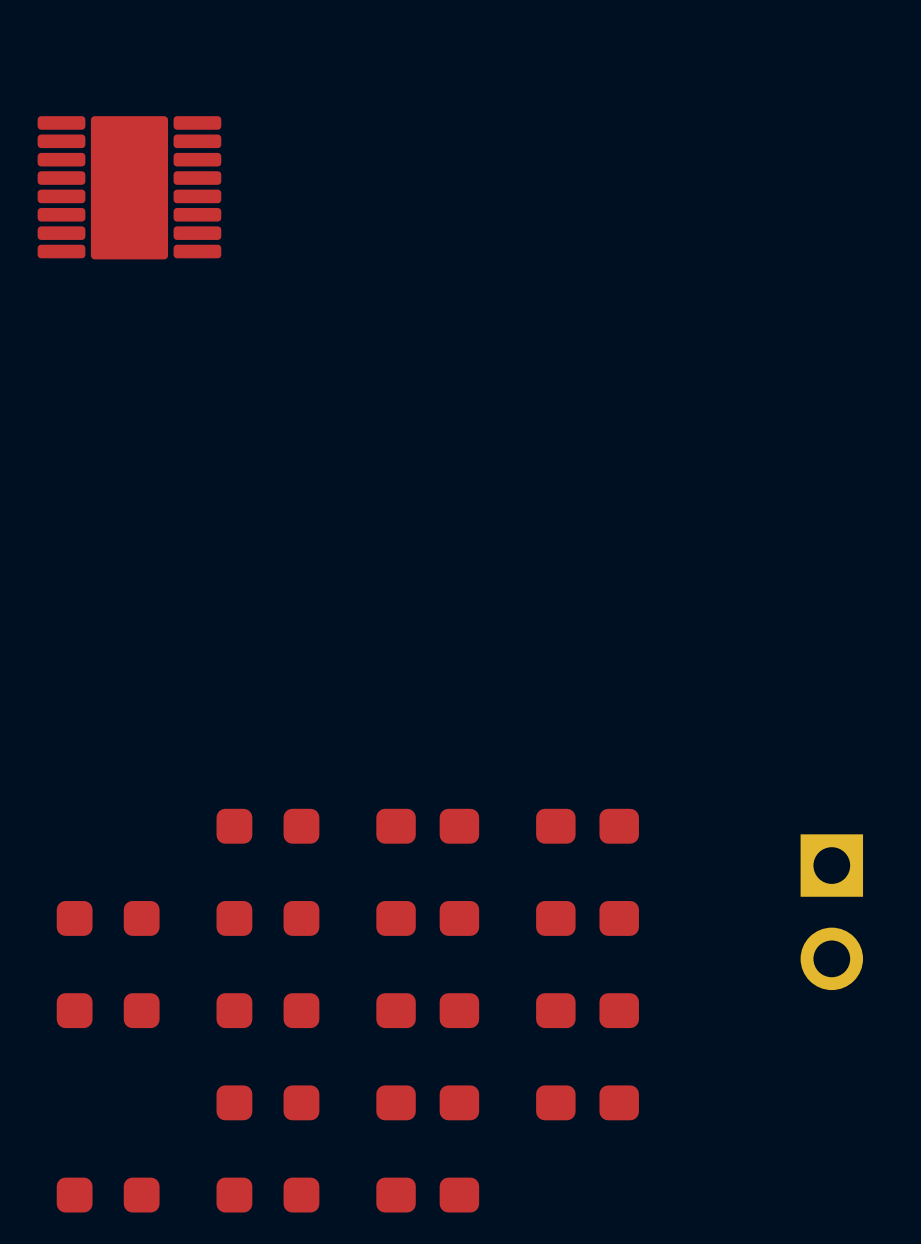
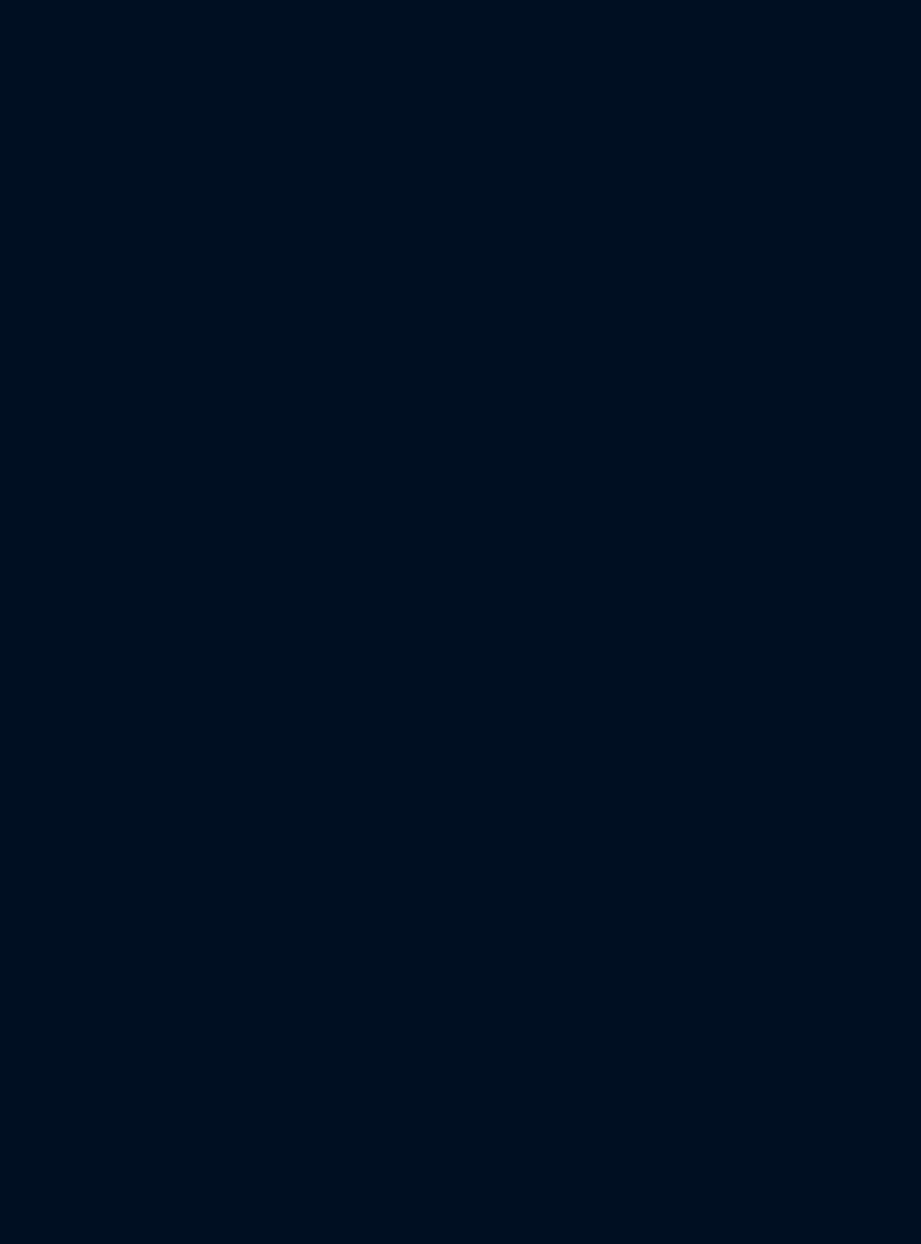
part: (129, 187) -> none
part: (267, 826) -> none
part: (427, 826) -> none
part: (587, 826) -> none
part: (831, 912) -> none
part: (108, 918) -> none
part: (267, 918) -> none
part: (427, 918) -> none
part: (587, 918) -> none
part: (108, 1010) -> none
part: (267, 1010) -> none
part: (427, 1010) -> none
part: (587, 1010) -> none
part: (267, 1102) -> none
part: (427, 1102) -> none
part: (587, 1102) -> none
part: (108, 1195) -> none
part: (267, 1195) -> none
part: (427, 1195) -> none

